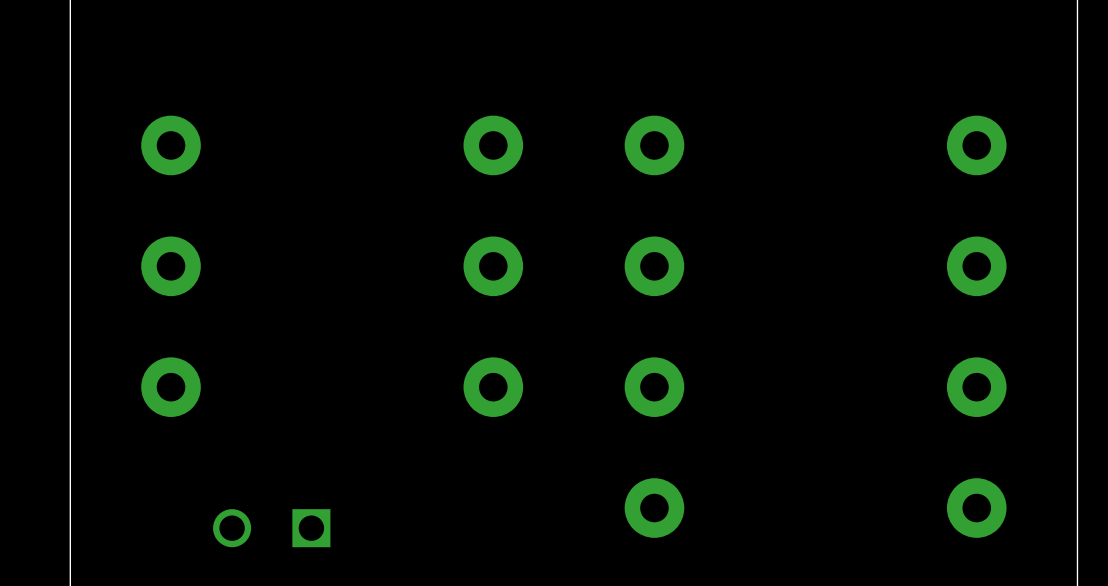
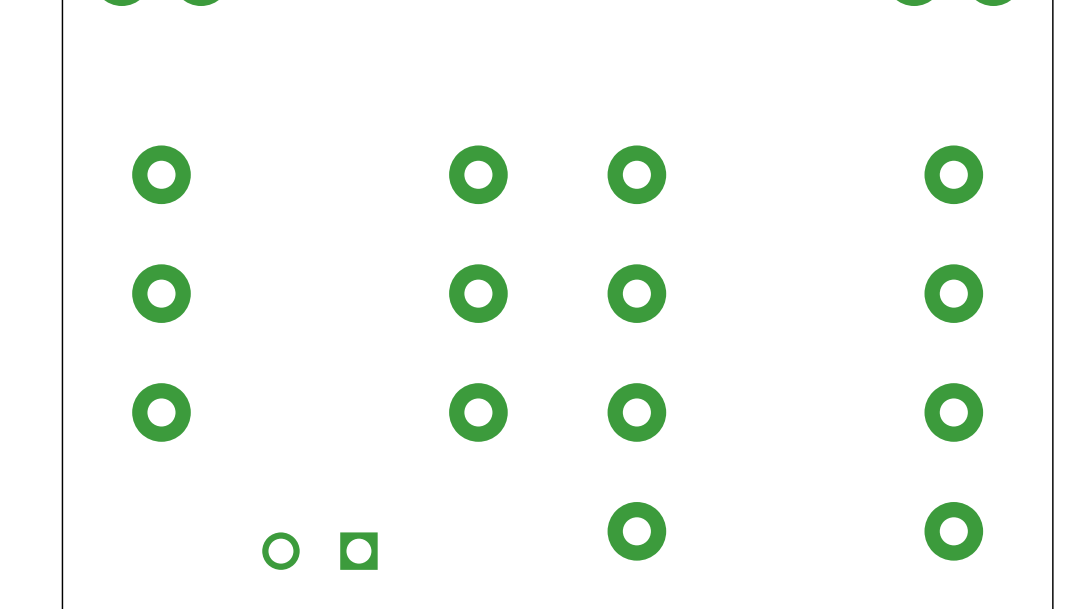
part position: (271, 528) -> (319, 551)

